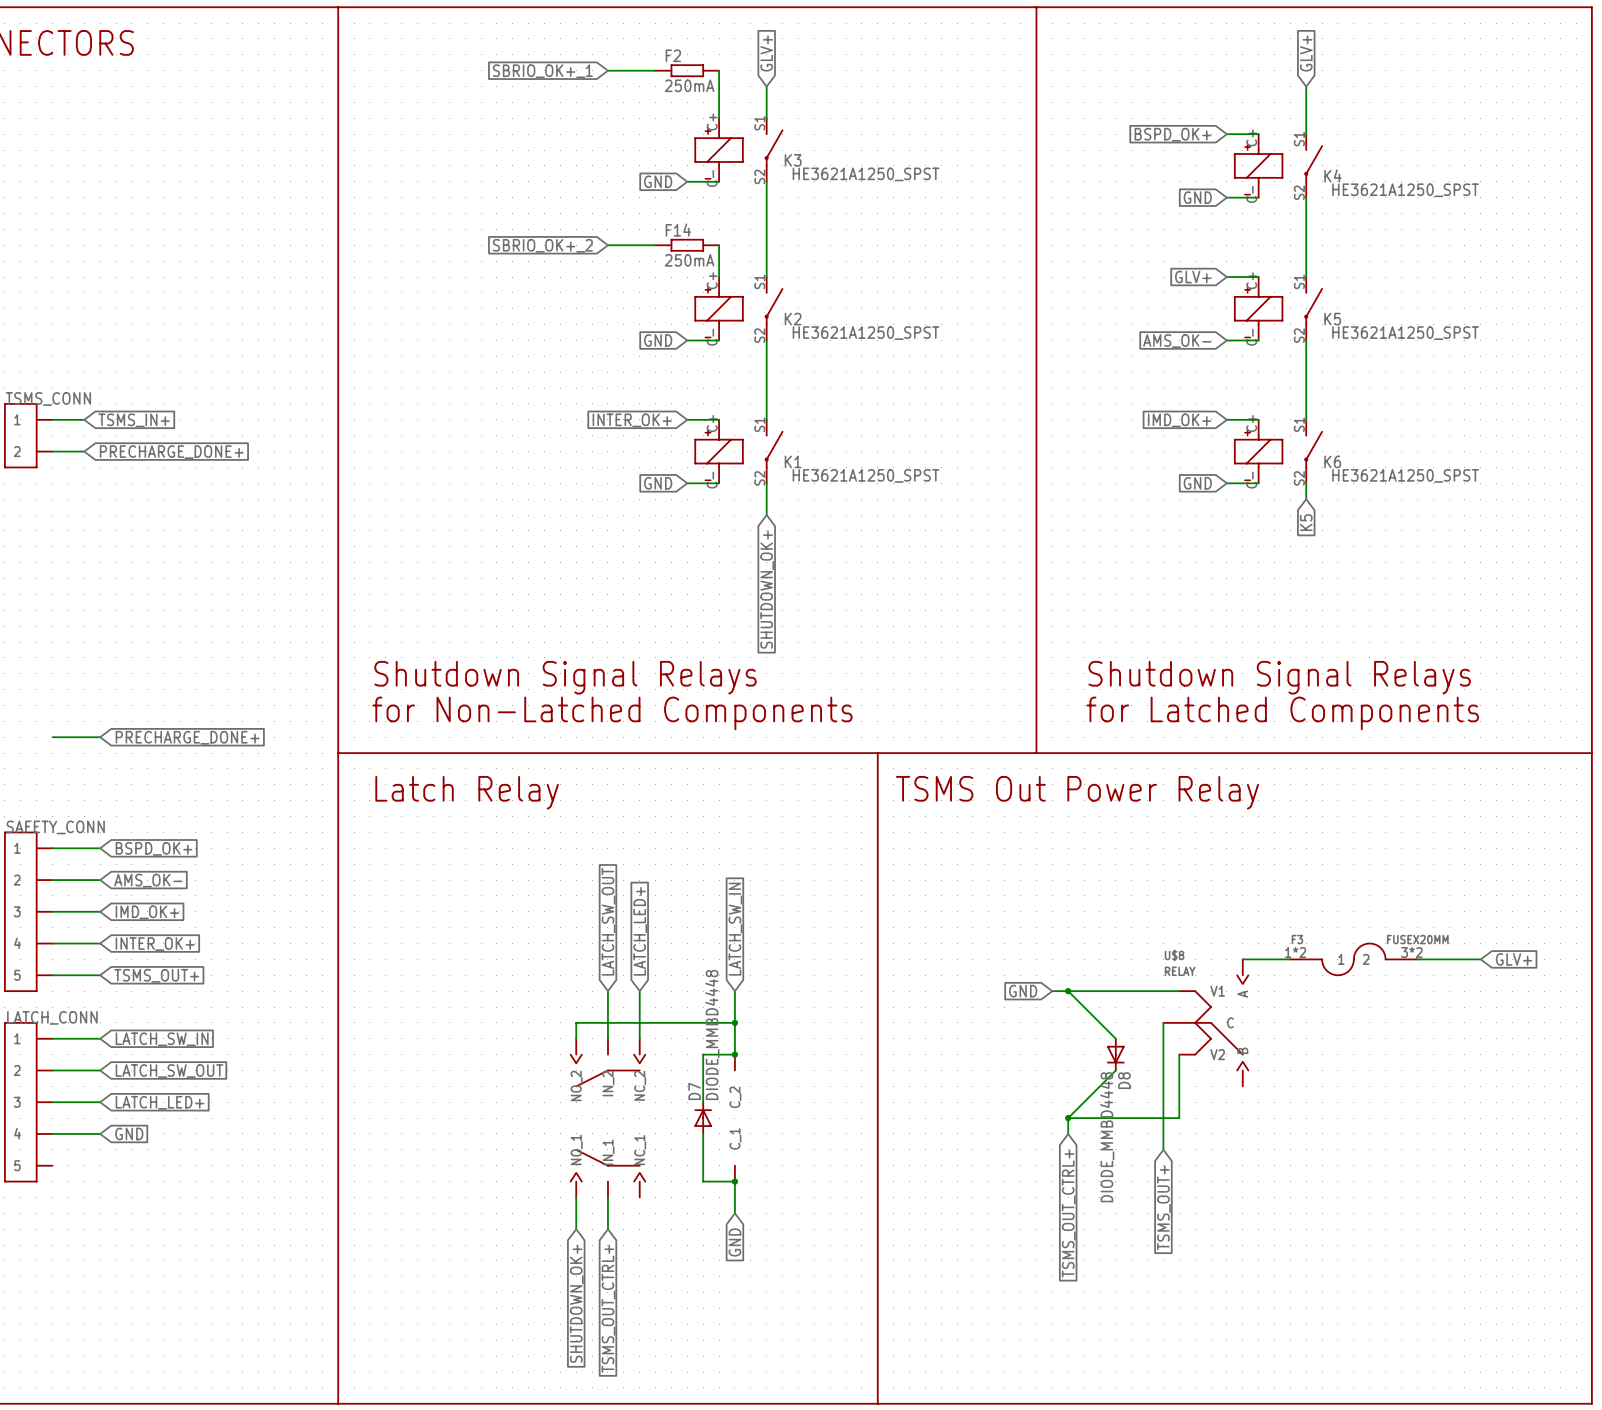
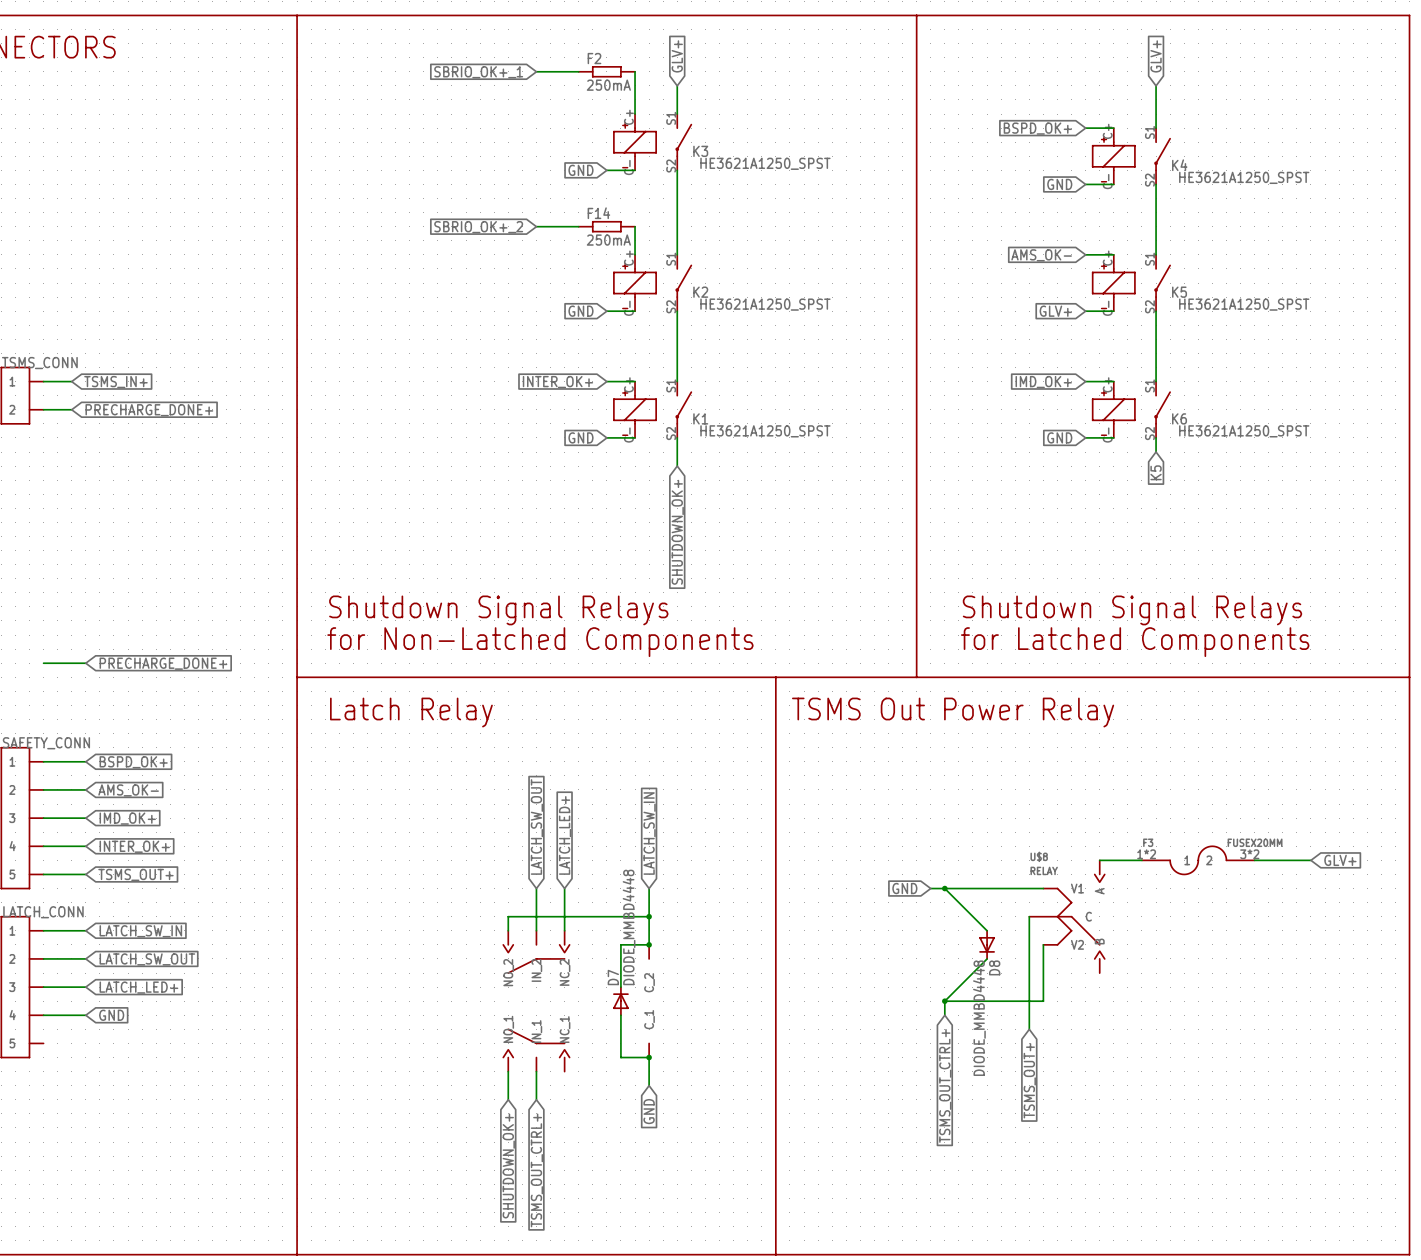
global label: GLV+ (1193, 277) -> AMS_OK- (1041, 255)
global label: AMS_OK- (1177, 341) -> GLV+ (1055, 311)

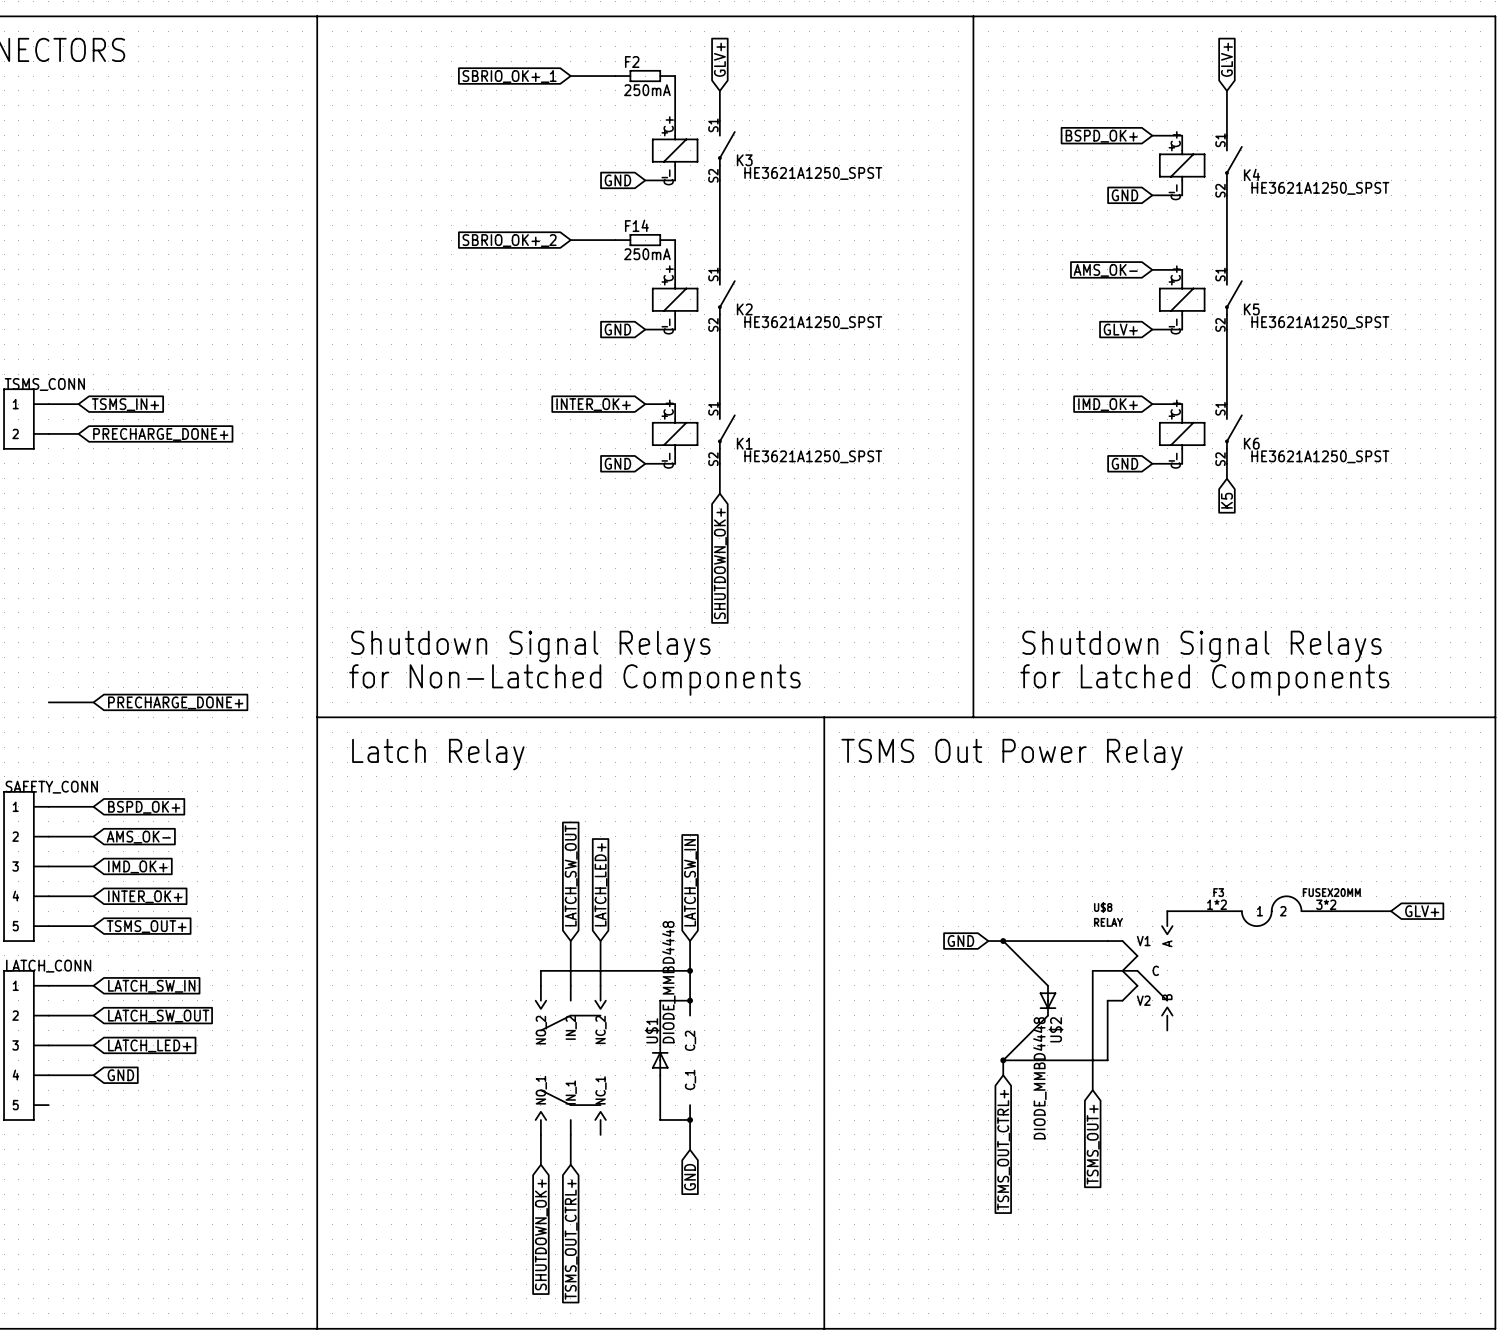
D8 name: D8 (994, 967) -> U$2 (1056, 1029)
D7 name: D7 (613, 977) -> U$1 (652, 1030)

